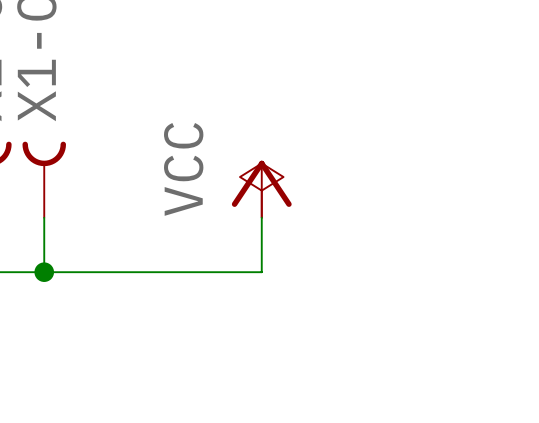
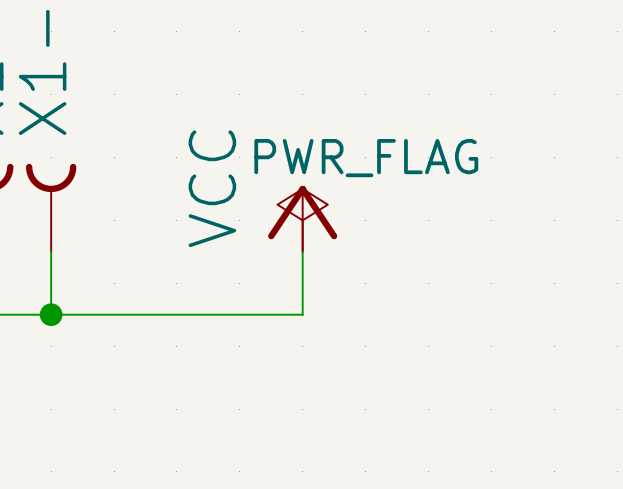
power symbol text: none -> PWR_FLAG (366, 158)

